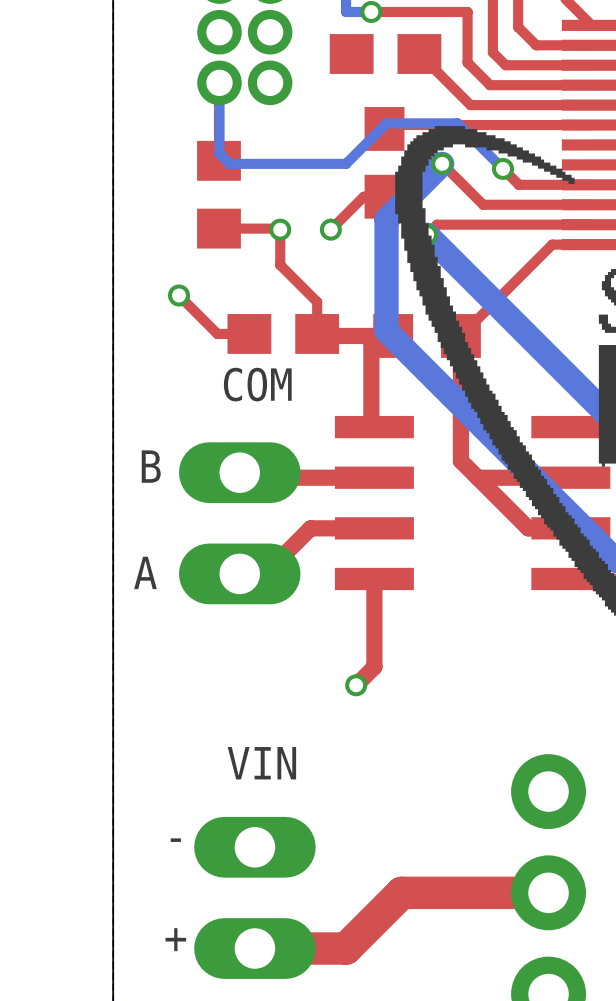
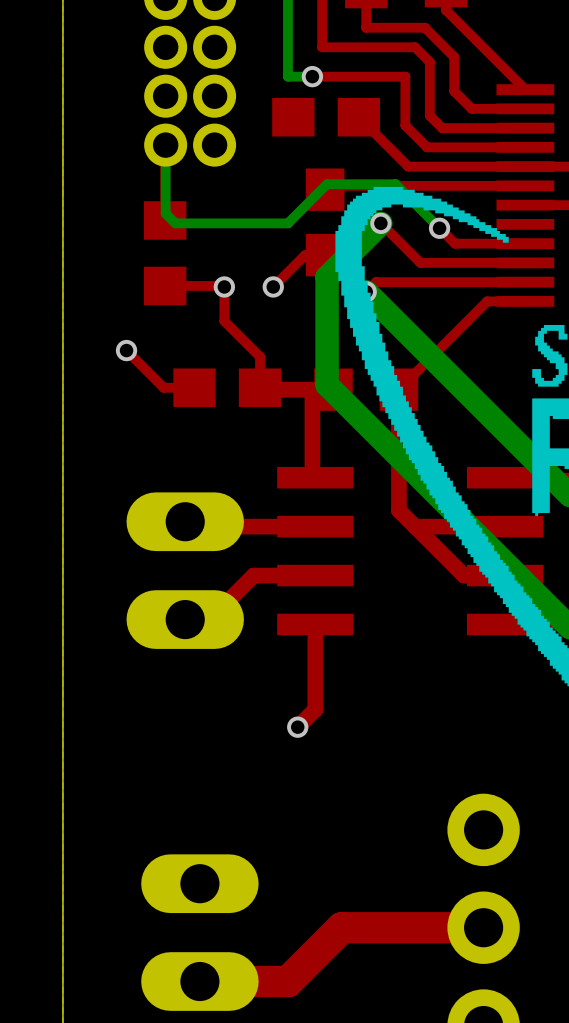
COM name: COM (257, 384) -> none
text: B (151, 466) -> none
text: A (145, 572) -> none
VIN name: VIN (261, 763) -> none
text: - (175, 840) -> none
text: + (175, 939) -> none

